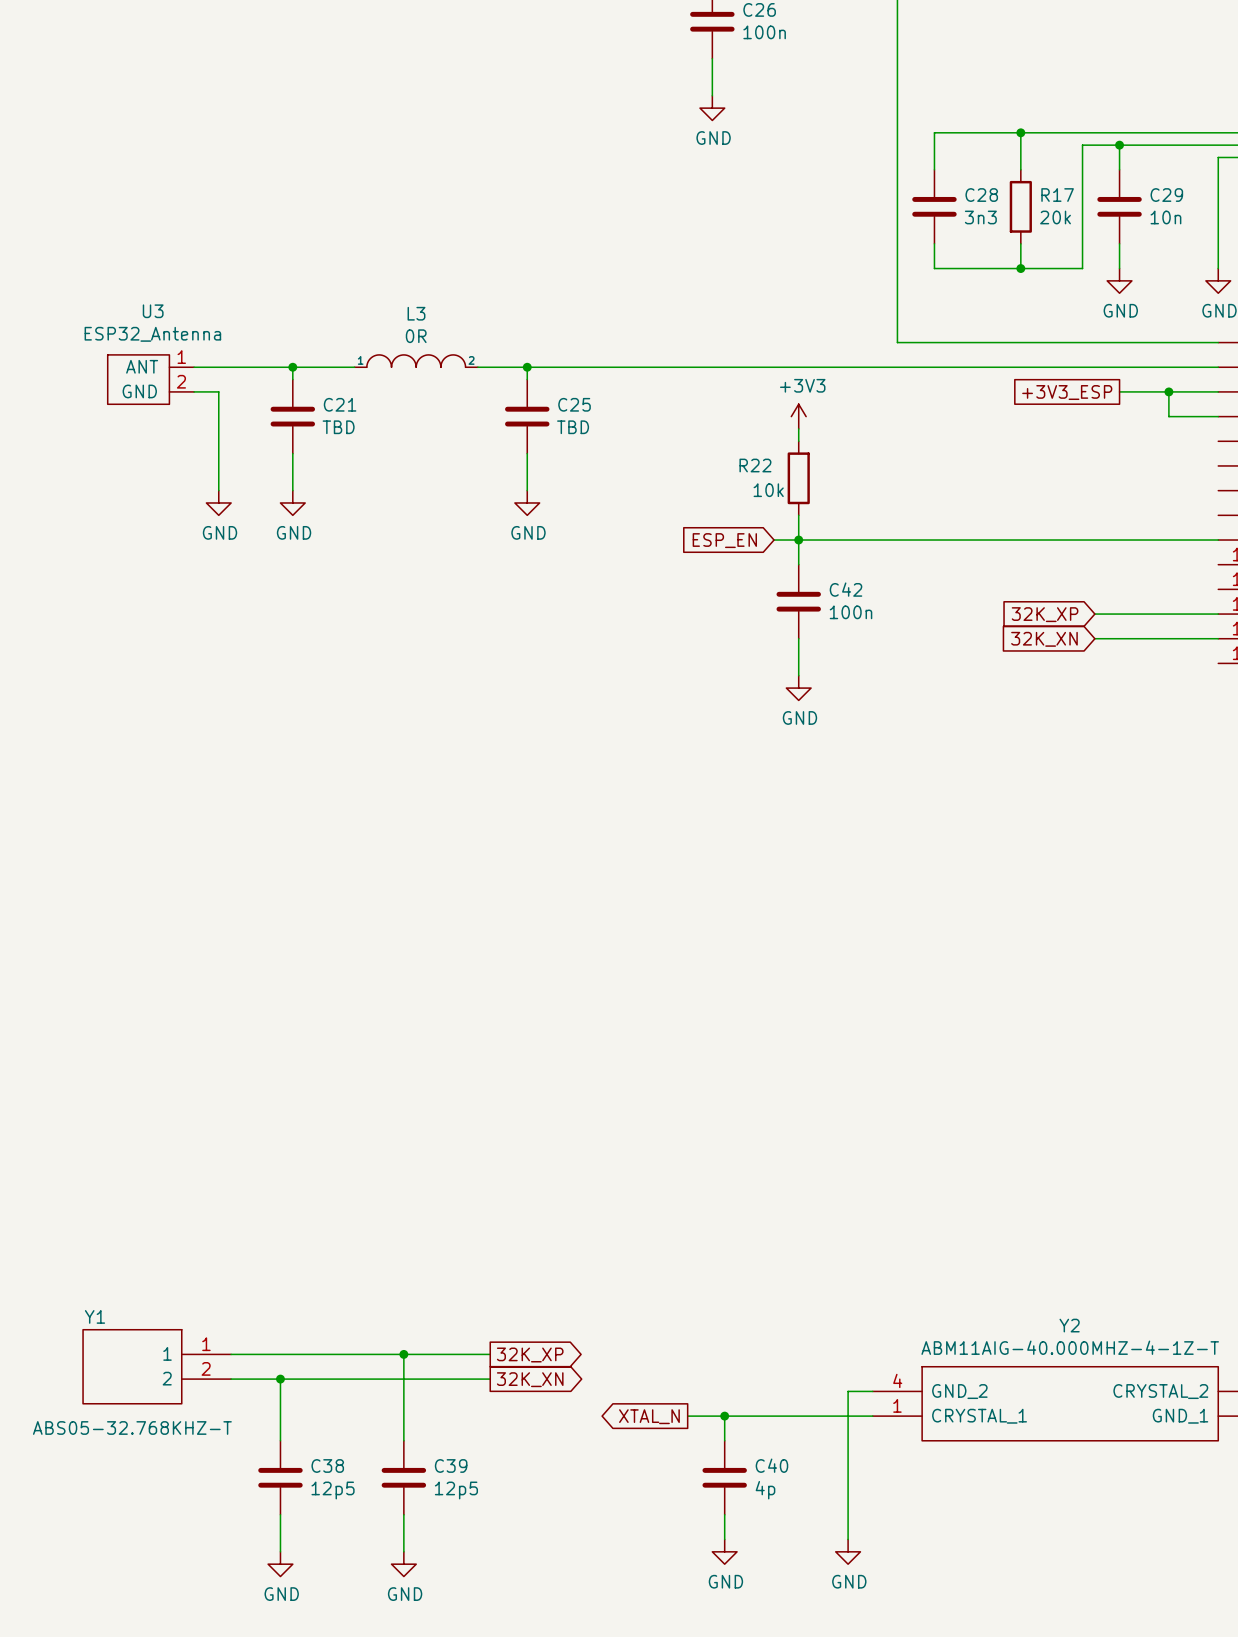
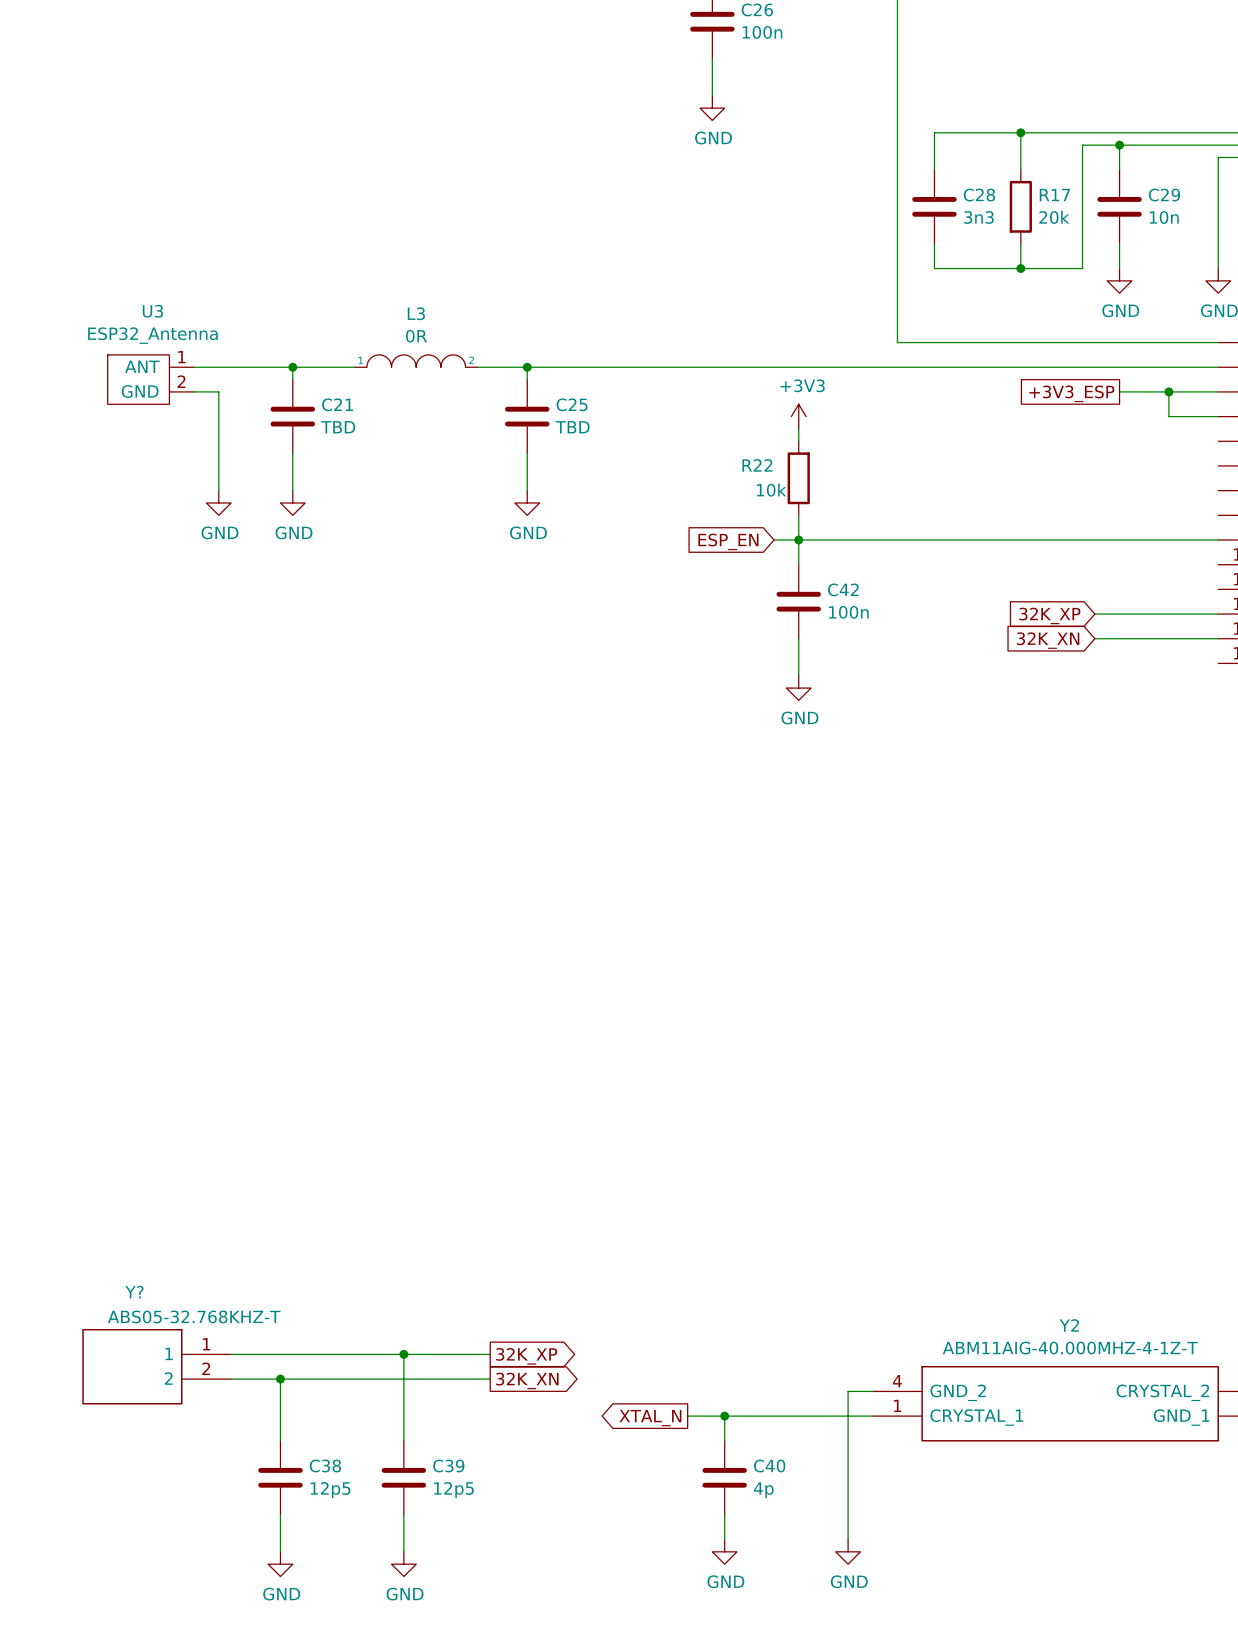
Y1 name: Y1 (94, 1316) -> Y? (134, 1292)
Y1 value position: ABS05-32.768KHZ-T (132, 1427) -> ABS05-32.768KHZ-T (194, 1316)

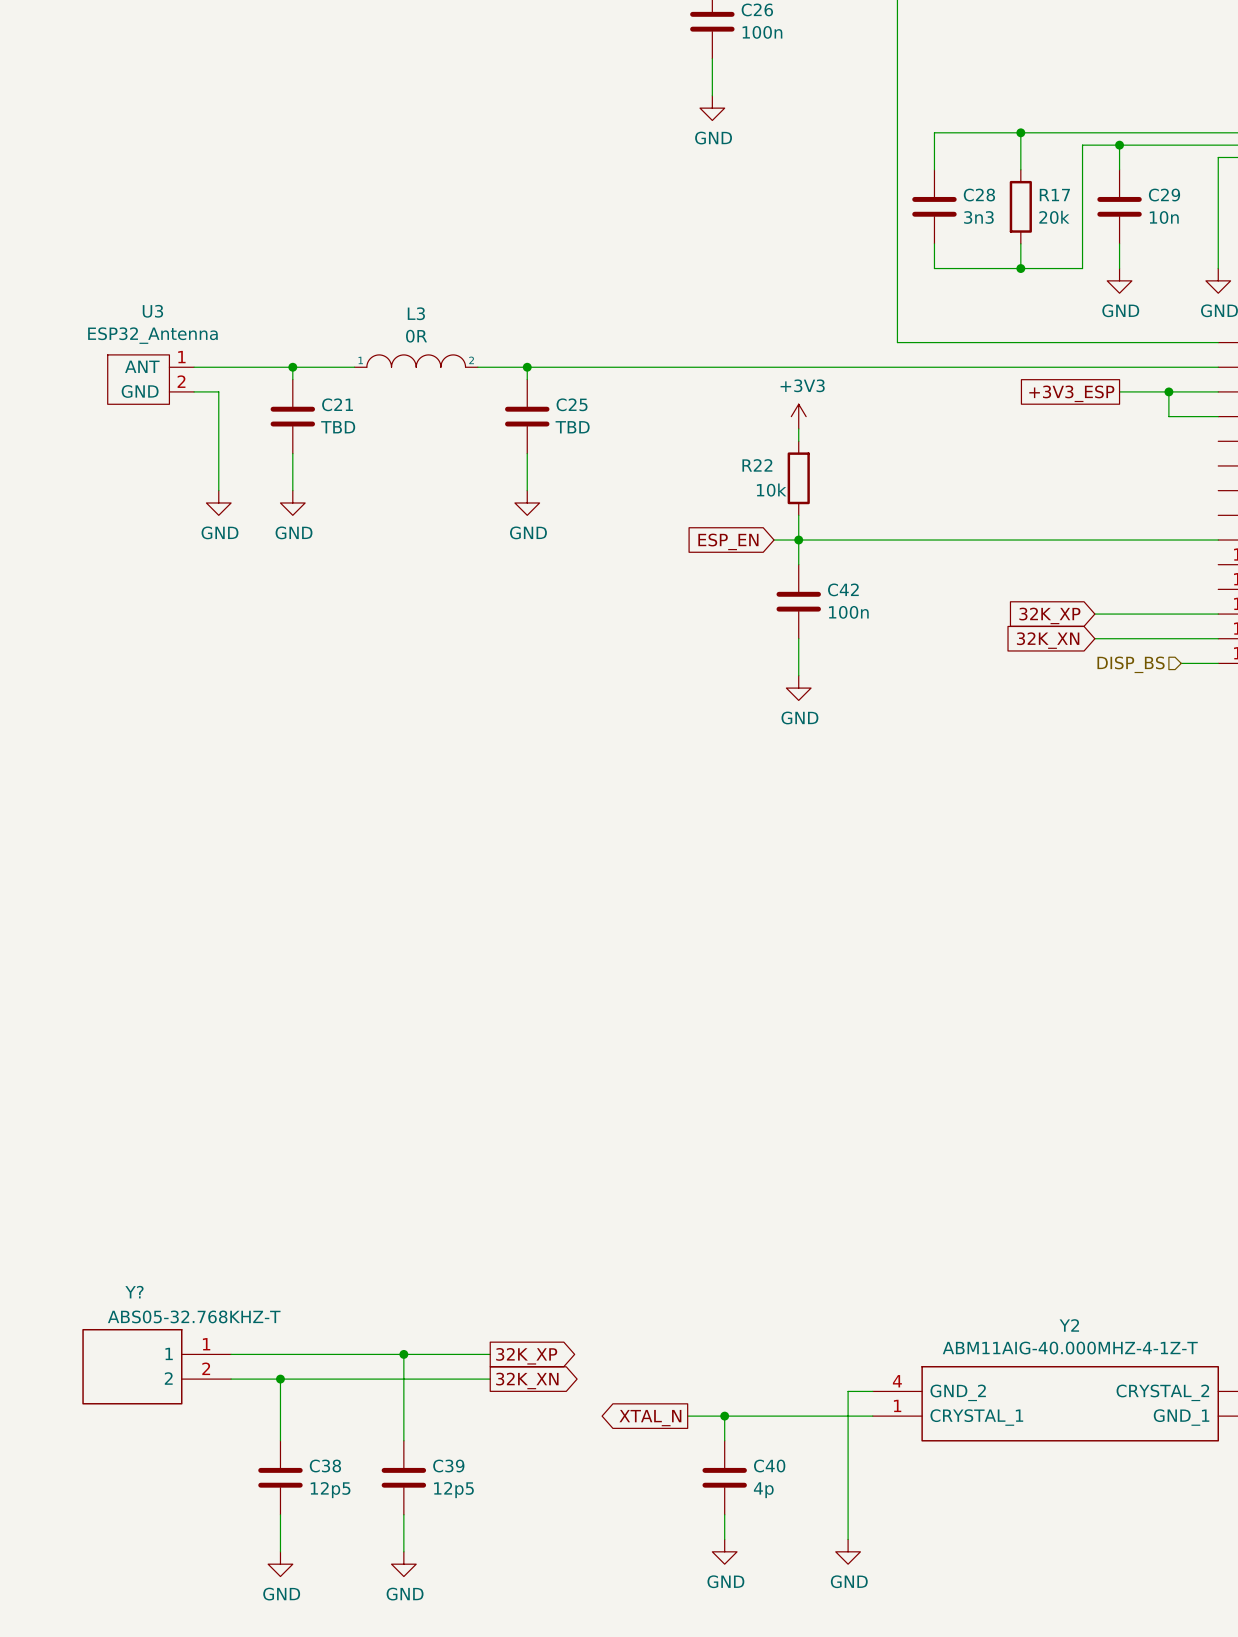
wire: none -> (1181, 663) (1218, 663)
hierarchical label: none -> DISP_BS (1131, 664)

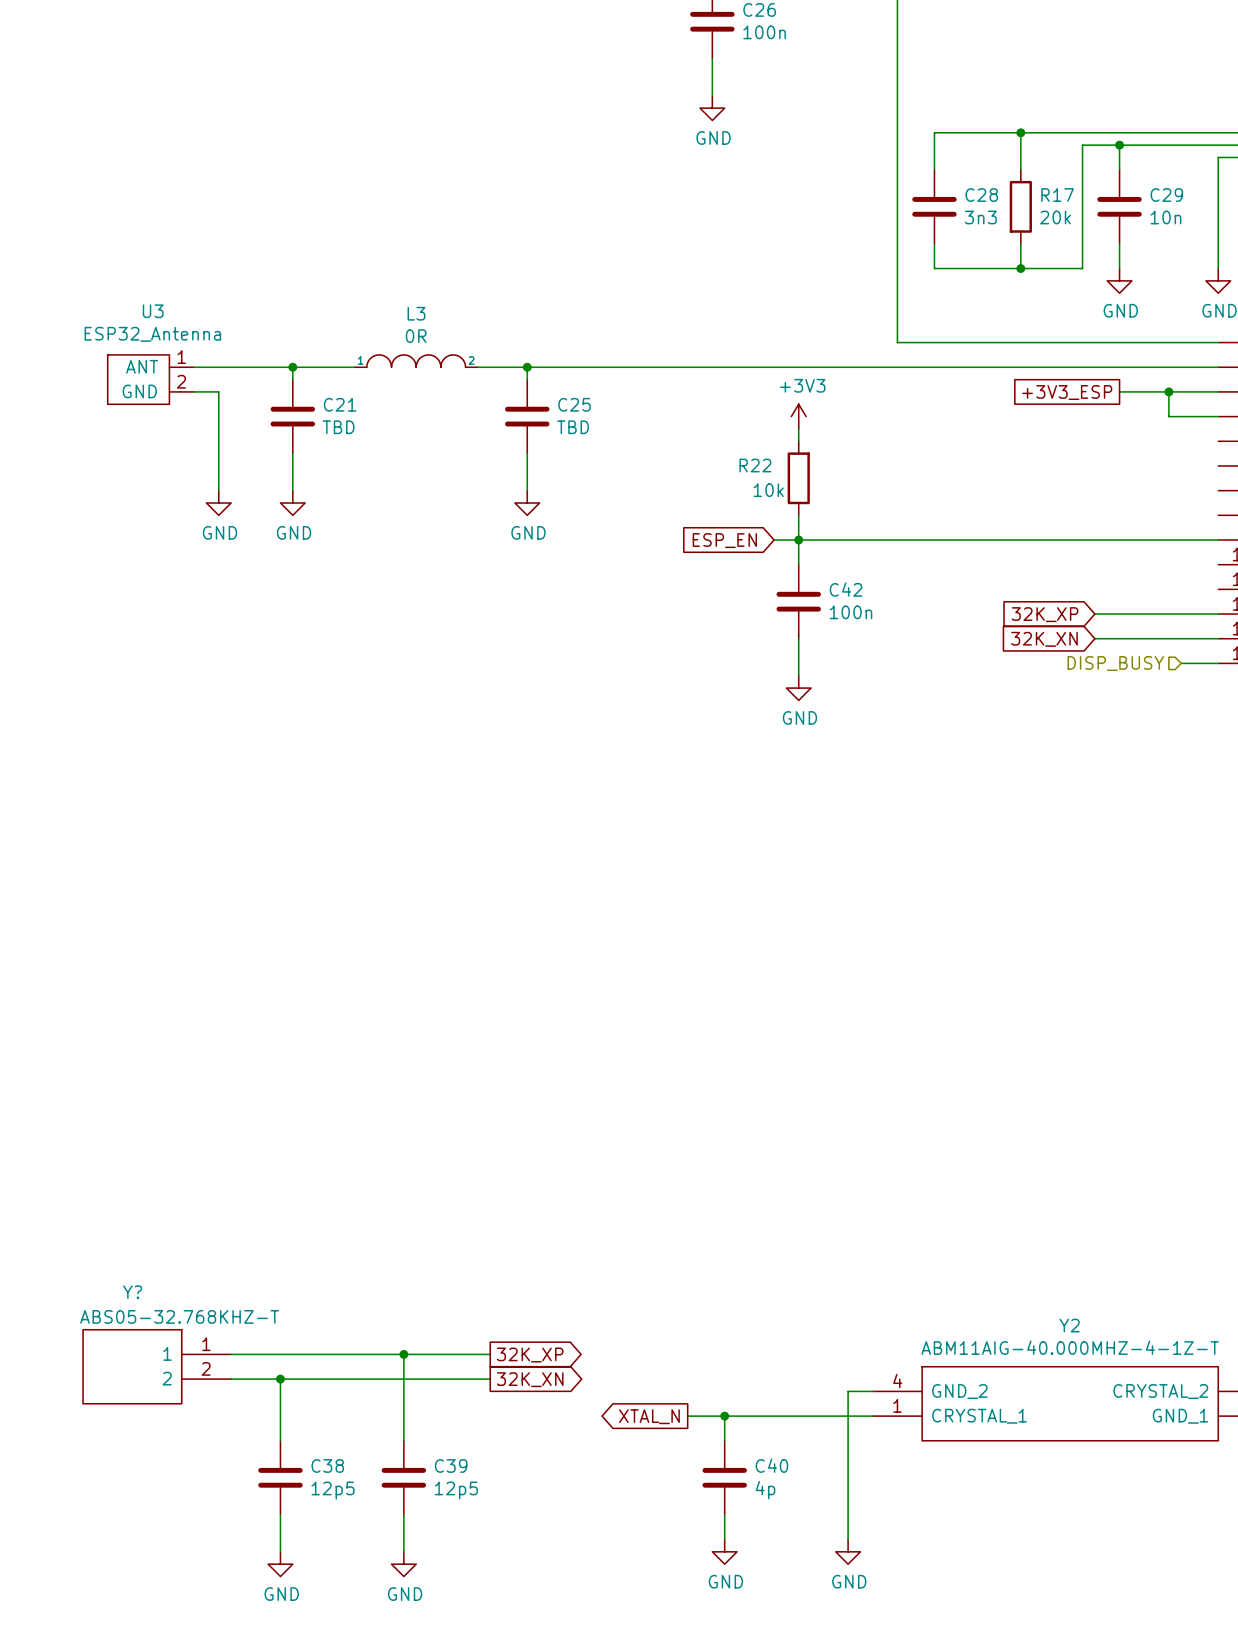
hierarchical label: DISP_BS (1131, 664) -> DISP_BUSY (1115, 663)

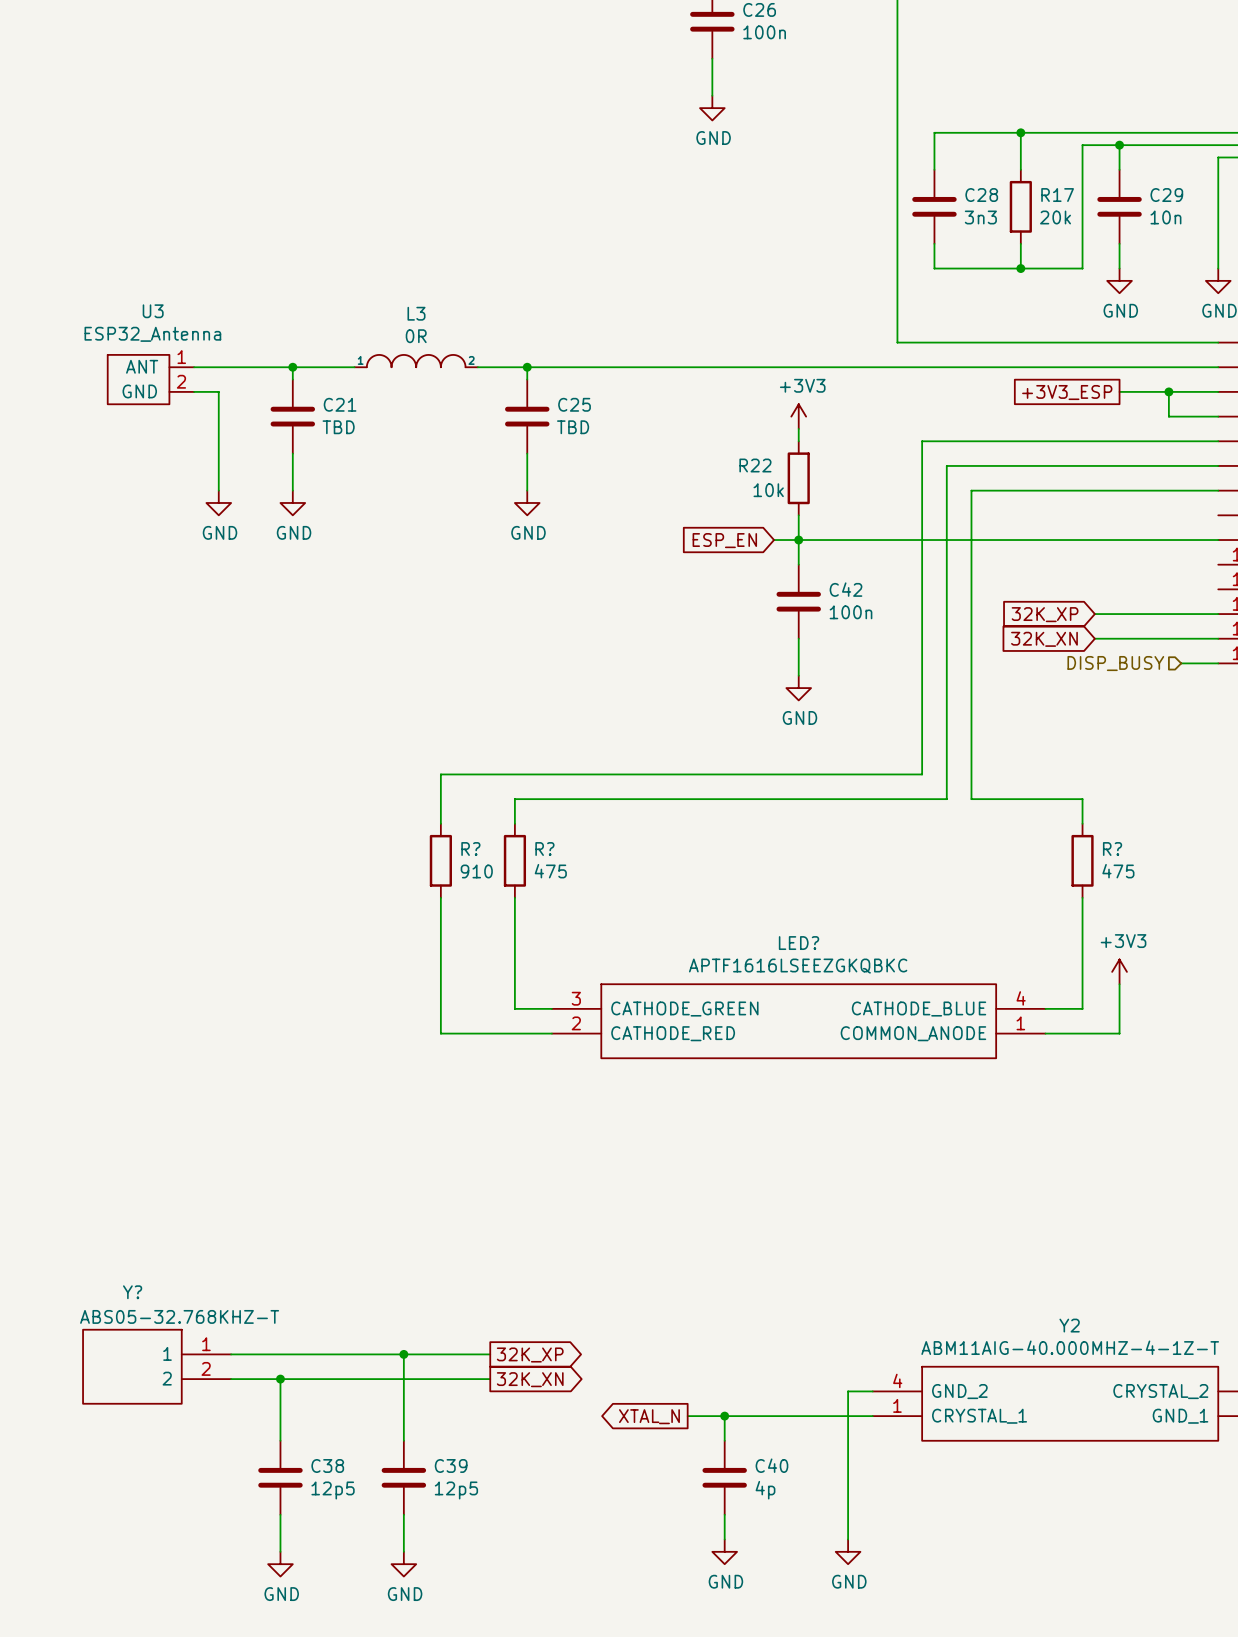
wire: none -> (1218, 441) (922, 441) (922, 774) (440, 774) (440, 823)
wire: none -> (1218, 465) (946, 465) (946, 799) (514, 799) (514, 823)
wire: none -> (1218, 490) (971, 490) (971, 799) (1082, 799) (1082, 823)
R?: none -> 910 (440, 860)
R?: none -> 475 (514, 860)
R?: none -> 475 (1082, 860)
wire: none -> (440, 897) (440, 1033) (551, 1033)
wire: none -> (514, 897) (514, 1008) (551, 1008)
wire: none -> (1082, 897) (1082, 1008) (1045, 1008)
power symbol: none -> +3V3 (1119, 971)
wire: none -> (1119, 984) (1119, 1033) (1045, 1033)
LED?: none -> APTF1616LSEEZGKQBKC (798, 1021)

